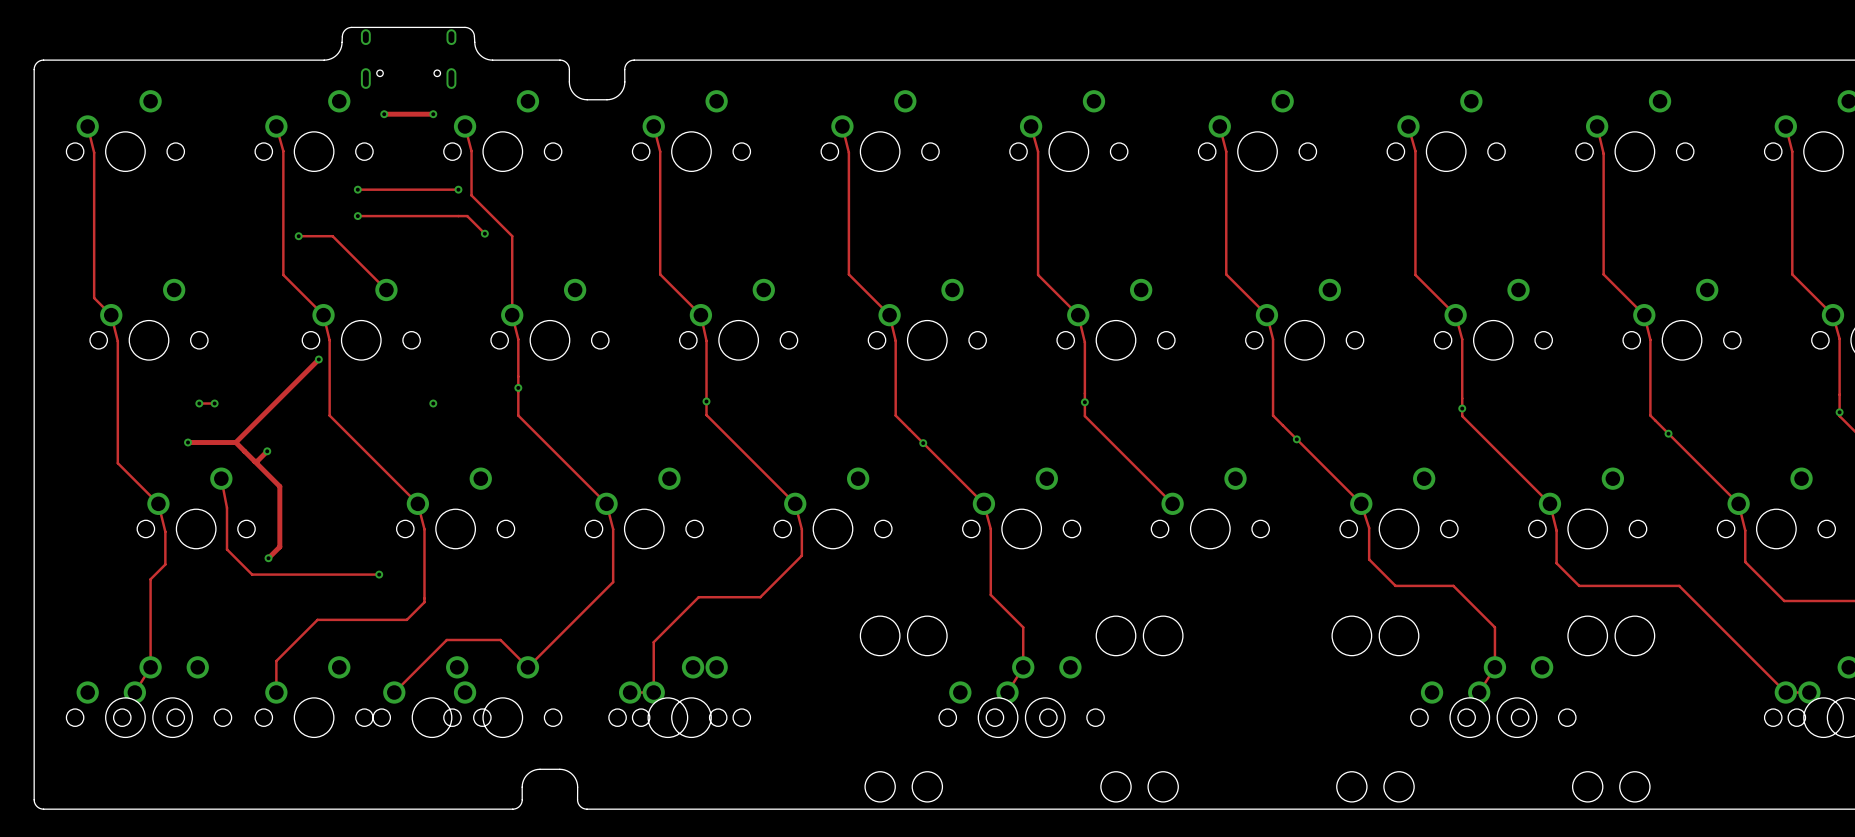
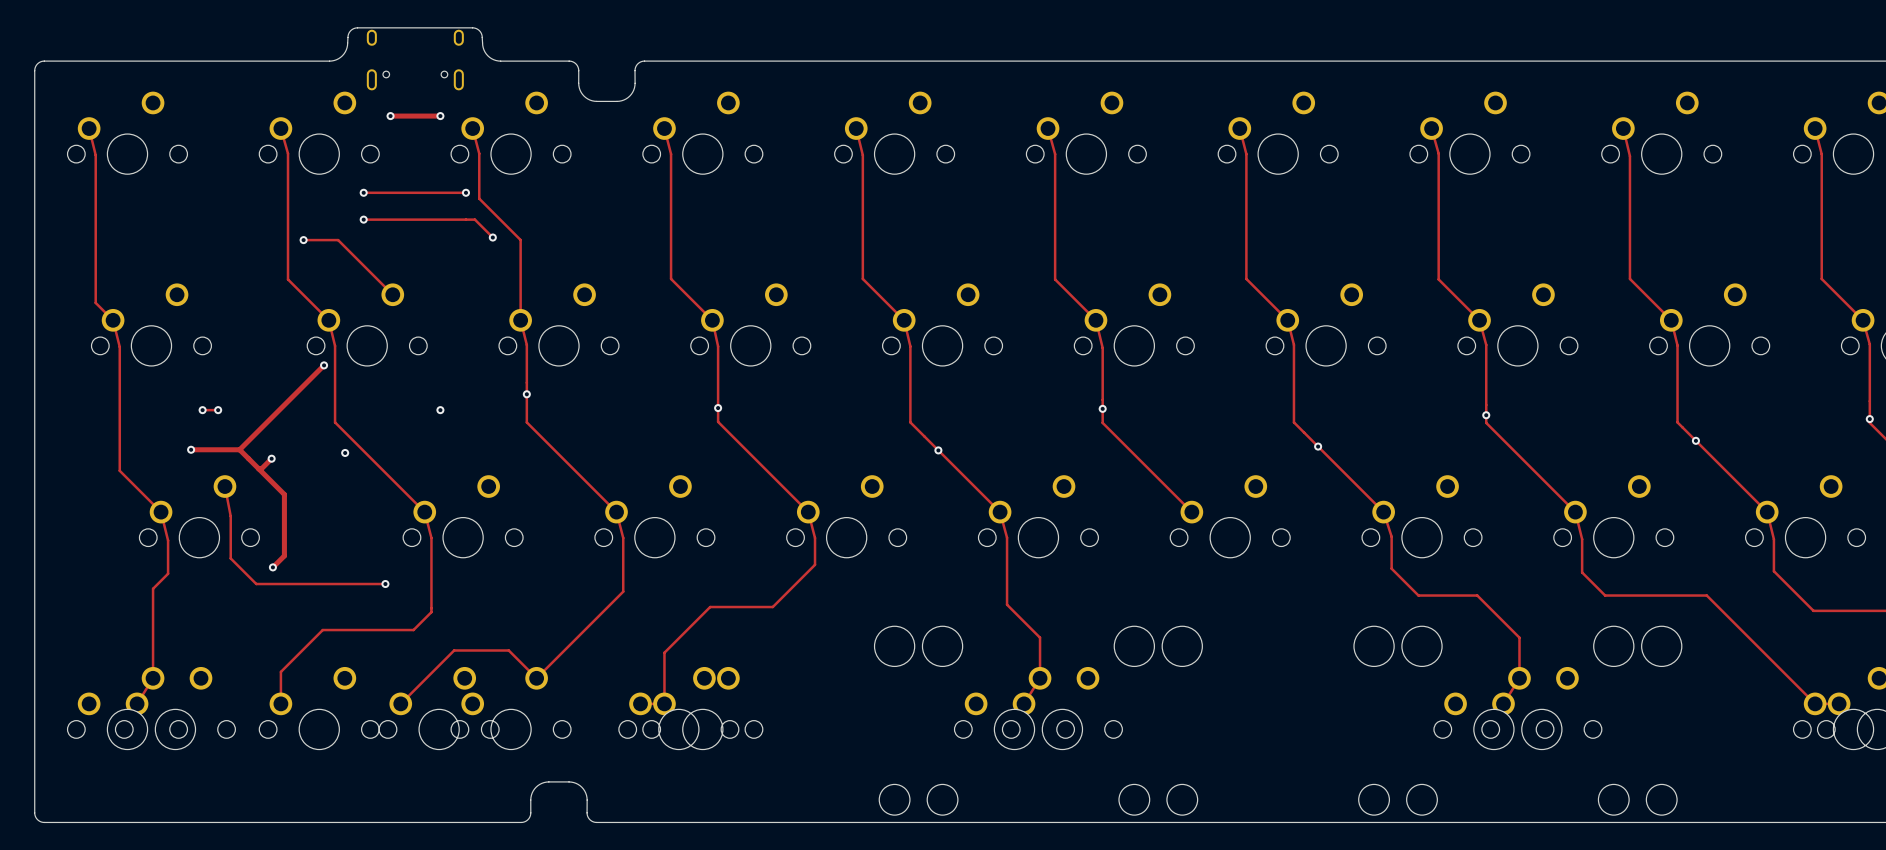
via: none -> (345, 452)

